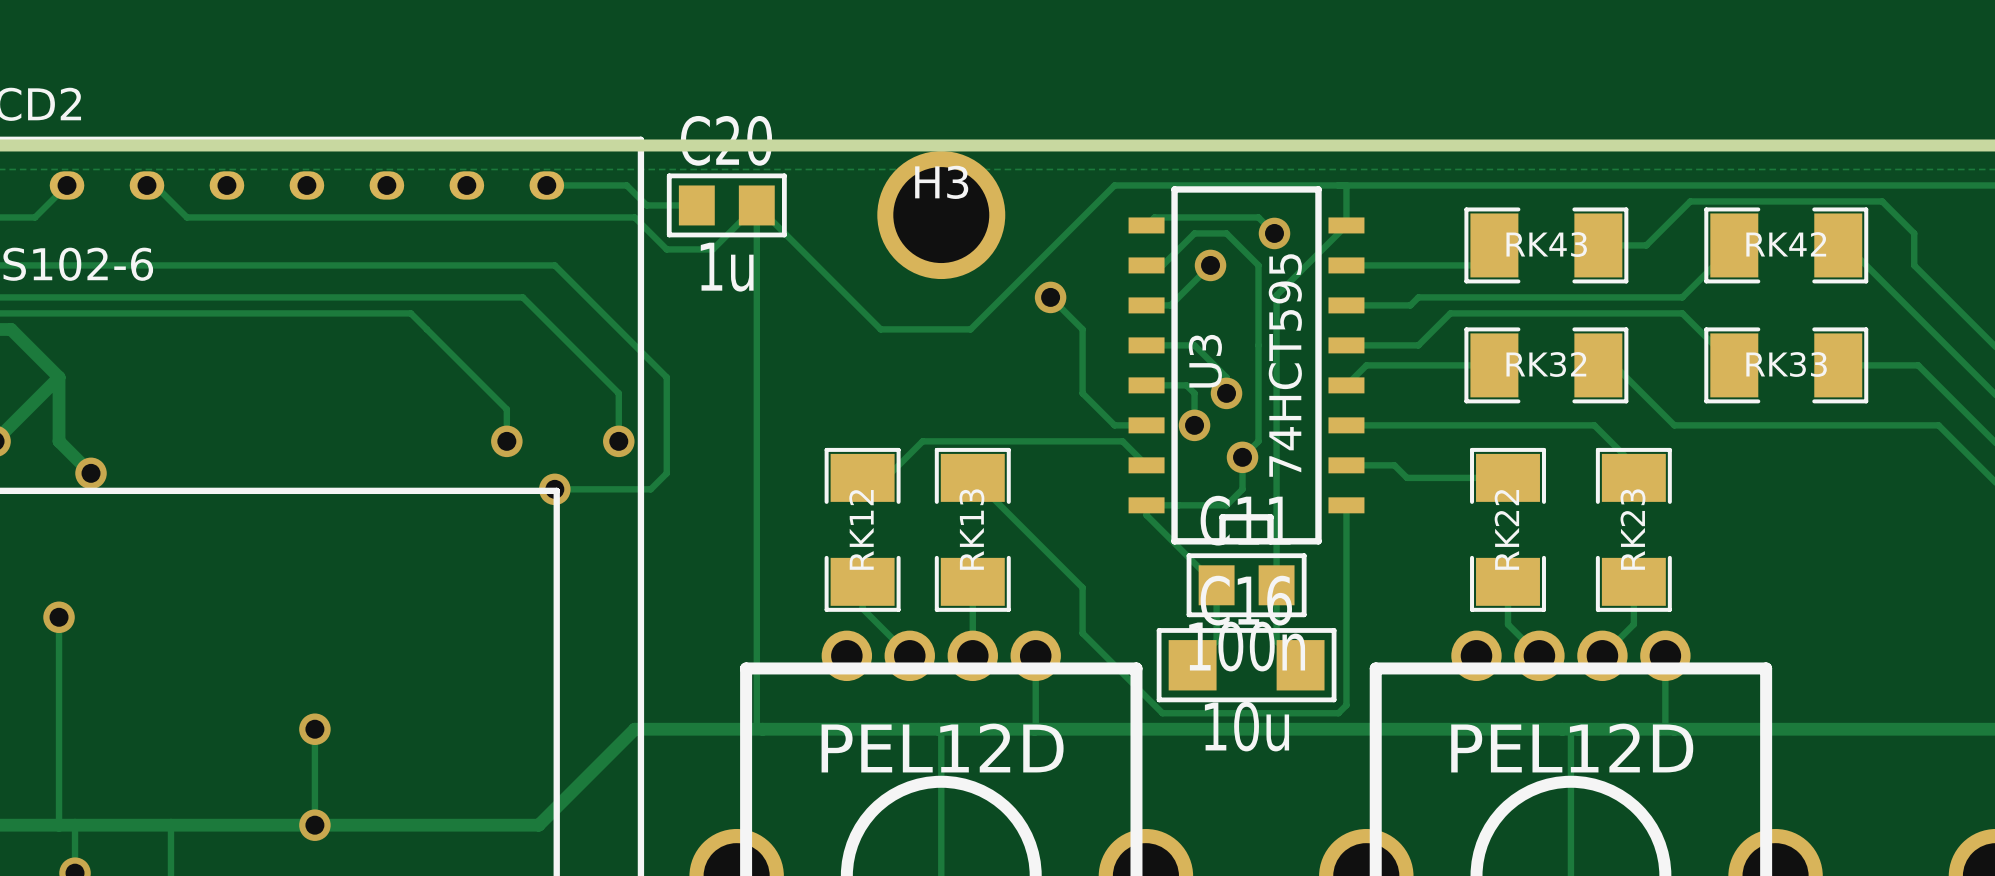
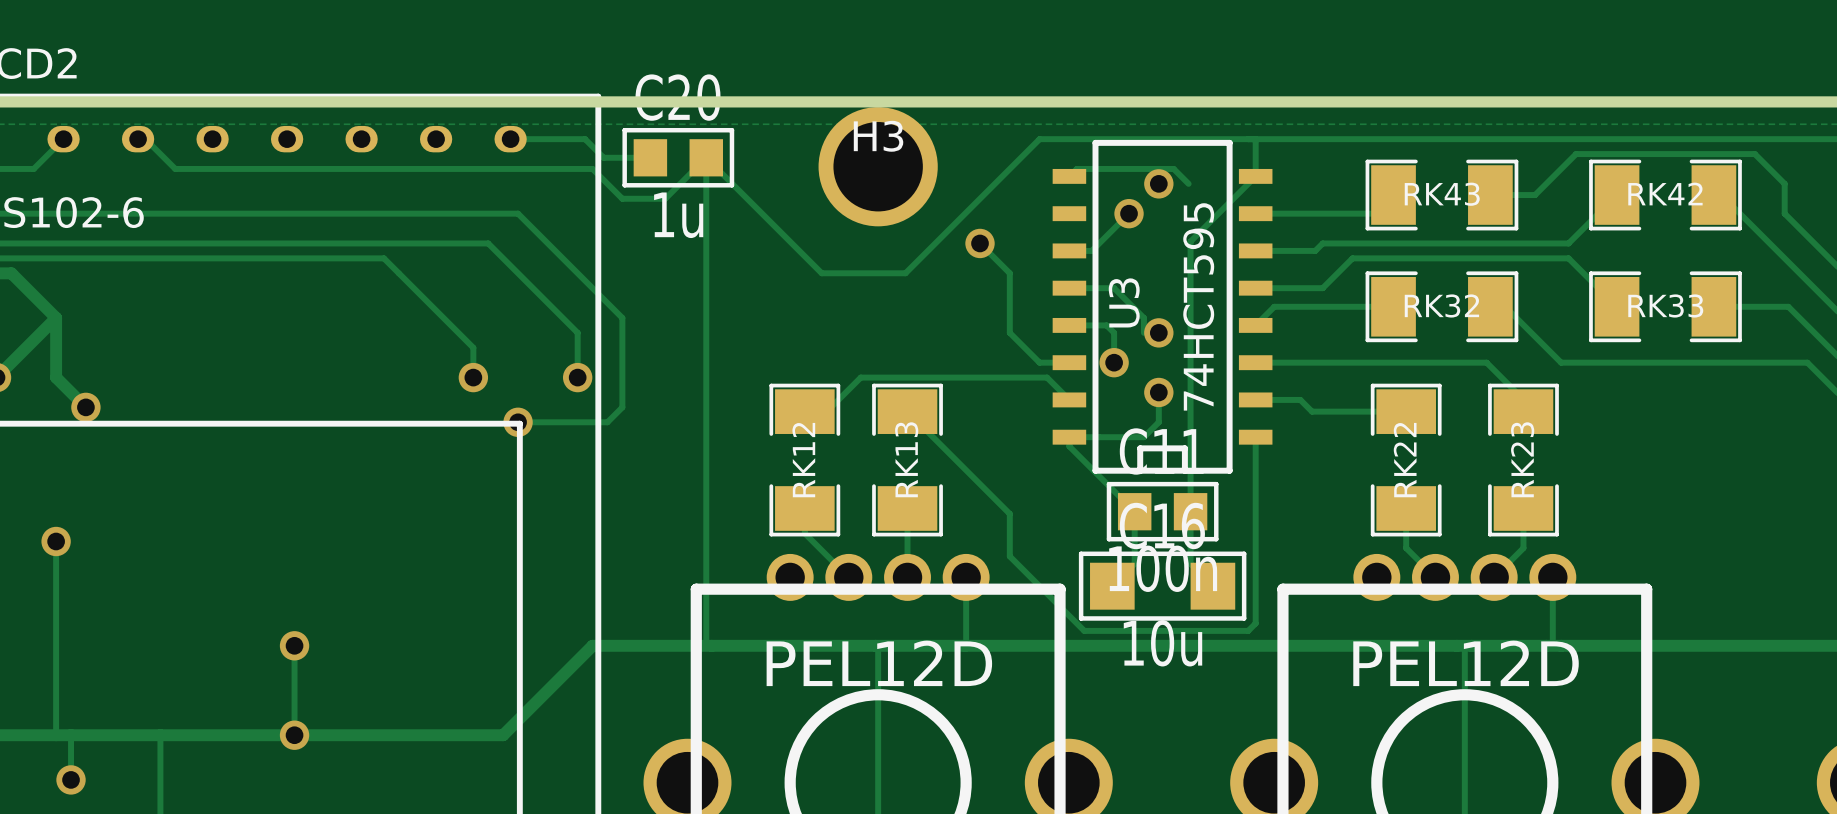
via position: (1274, 233) -> (1158, 183)
track: (1146, 265) (1162, 265) (1194, 233) (1226, 233) (1258, 265) (1258, 441) (1242, 457) -> none
via position: (1226, 393) -> (1158, 332)

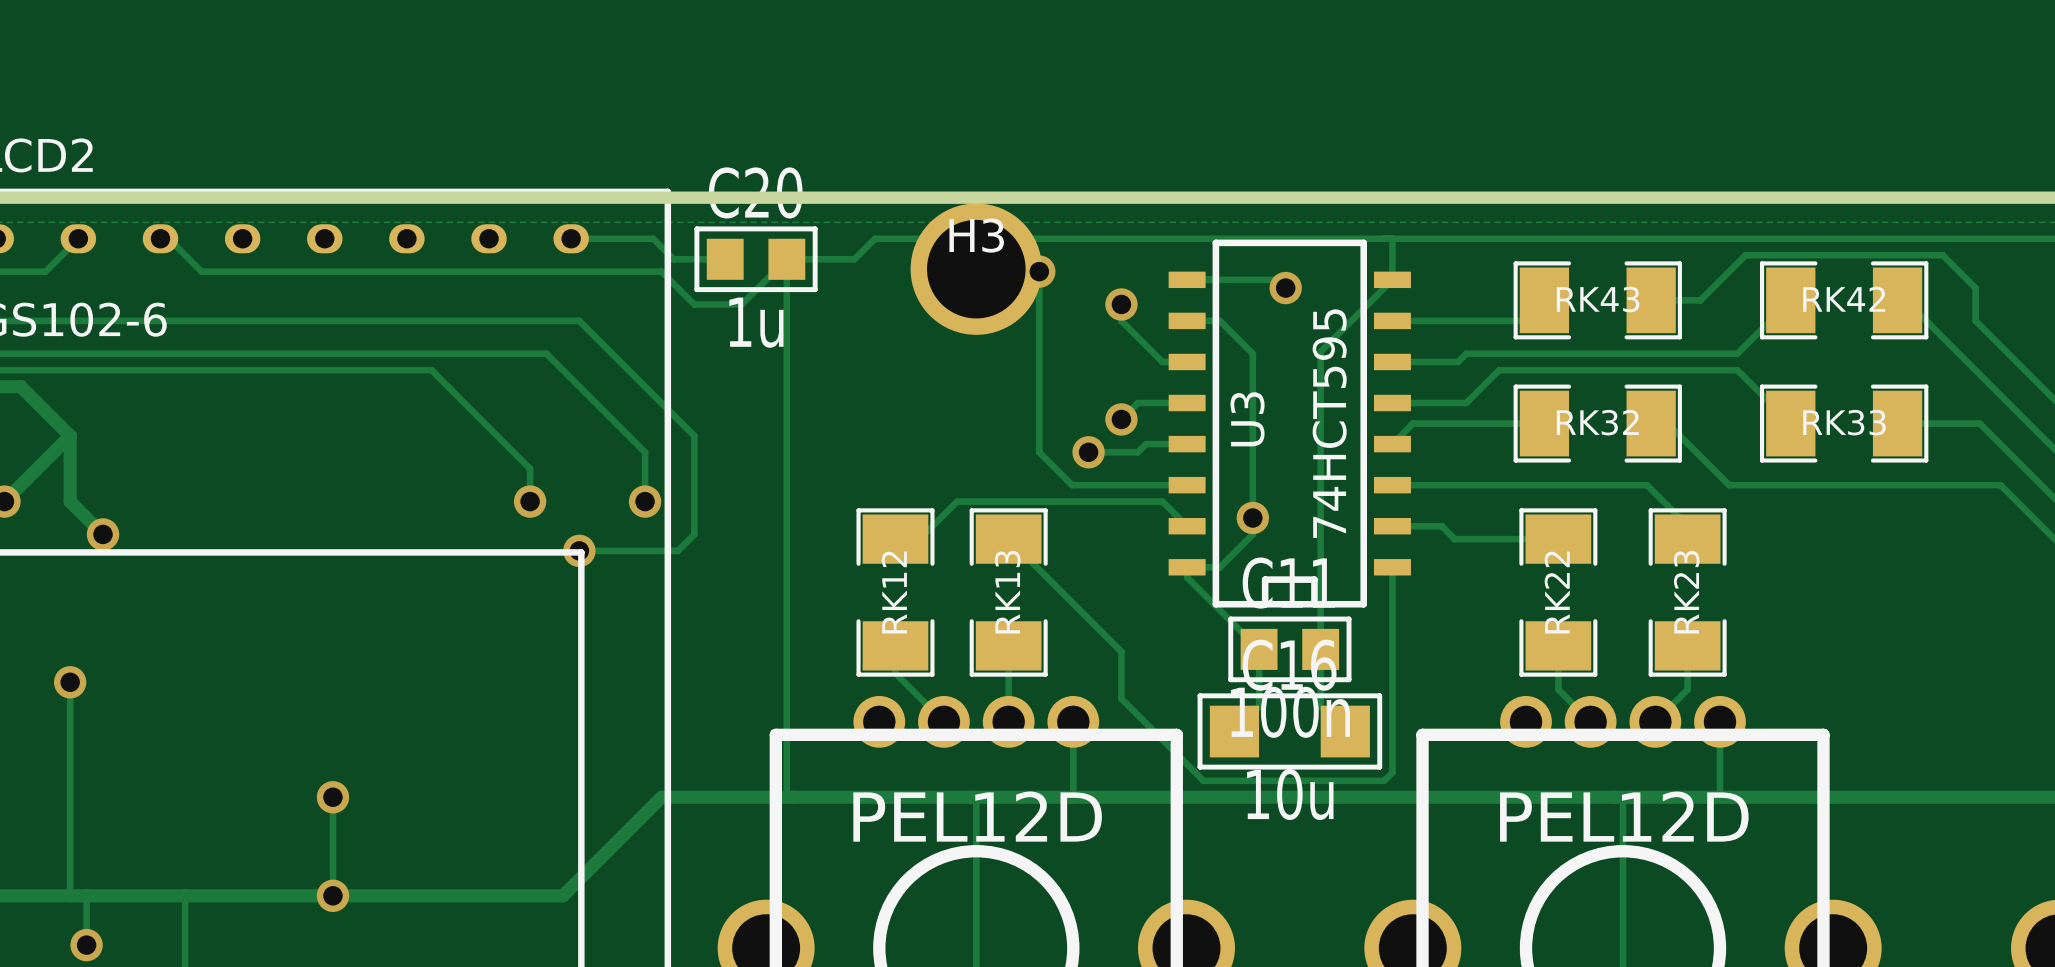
track: (1039, 139) (905, 273) (821, 273) (706, 157) -> (1154, 238) (875, 238) (854, 259) (786, 259)
via: none -> (1039, 271)
track: (1069, 176) (1076, 168) (1173, 168) (1188, 183) -> (1187, 279) (1277, 279) (1285, 288)
via: none -> (1121, 304)
track: (1129, 213) (1091, 250) (1069, 250) -> (1121, 304) (1121, 320) (1162, 361) (1187, 361)
via: (1129, 213) -> none
track: (980, 243) (1009, 273) (1009, 332) (1039, 362) -> (1039, 271) (1039, 452) (1072, 485) (1154, 485)
via: (980, 243) -> none
track: (1069, 288) (1114, 288) (1143, 317) (1143, 332) -> (1187, 403) (1137, 403) (1121, 419)
via: none -> (1121, 419)
track: (1069, 325) (1106, 325) (1114, 332) (1114, 362) -> (1187, 444) (1146, 444) (1137, 452) (1088, 452)
via: none -> (1088, 452)
via: (1158, 332) -> none
via: (1114, 362) -> none
via: none -> (1252, 518)
track: (1158, 392) (1158, 422) (1143, 437) (1099, 437) -> (1187, 320) (1219, 320) (1252, 353) (1252, 534) (1219, 567)
via: (1158, 392) -> none

